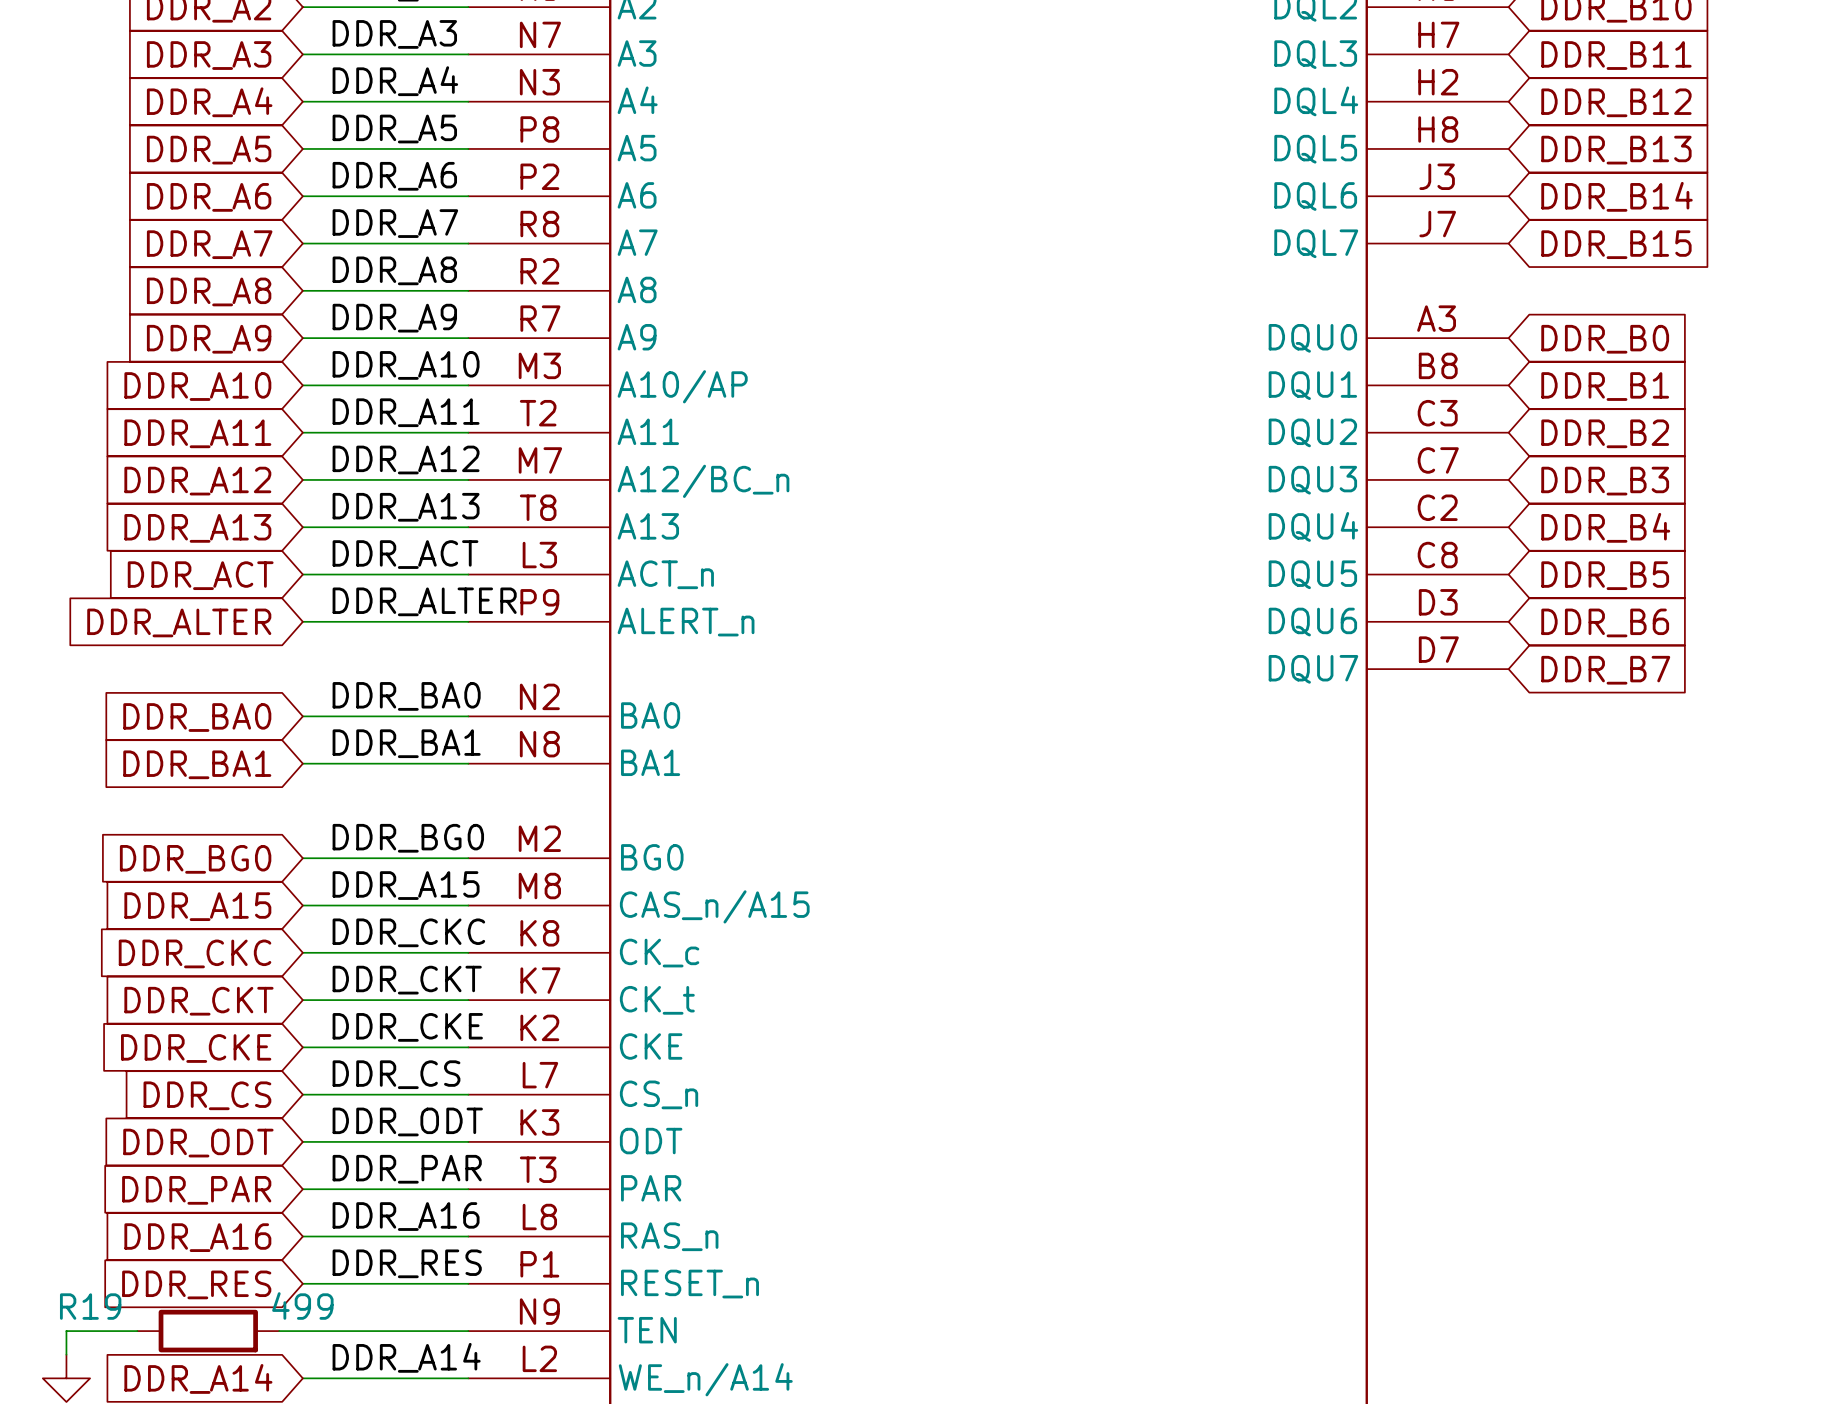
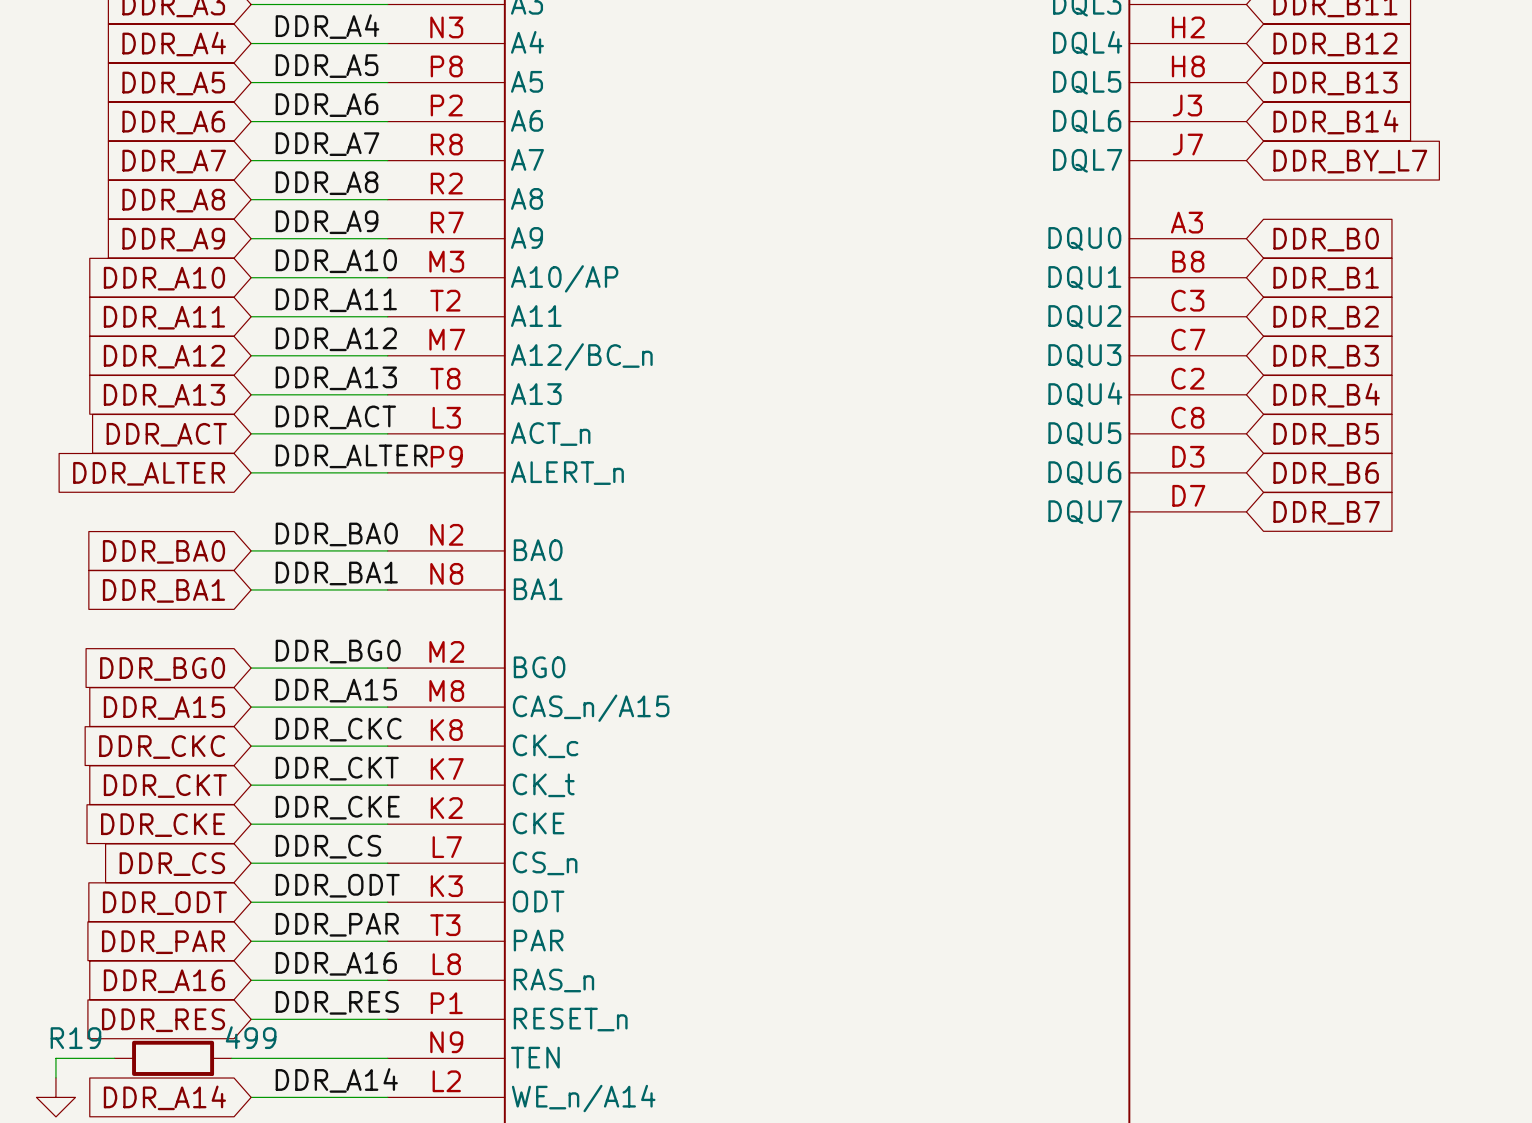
global label: DDR_B15 (1616, 244) -> DDR_BY_L7 (1350, 161)

